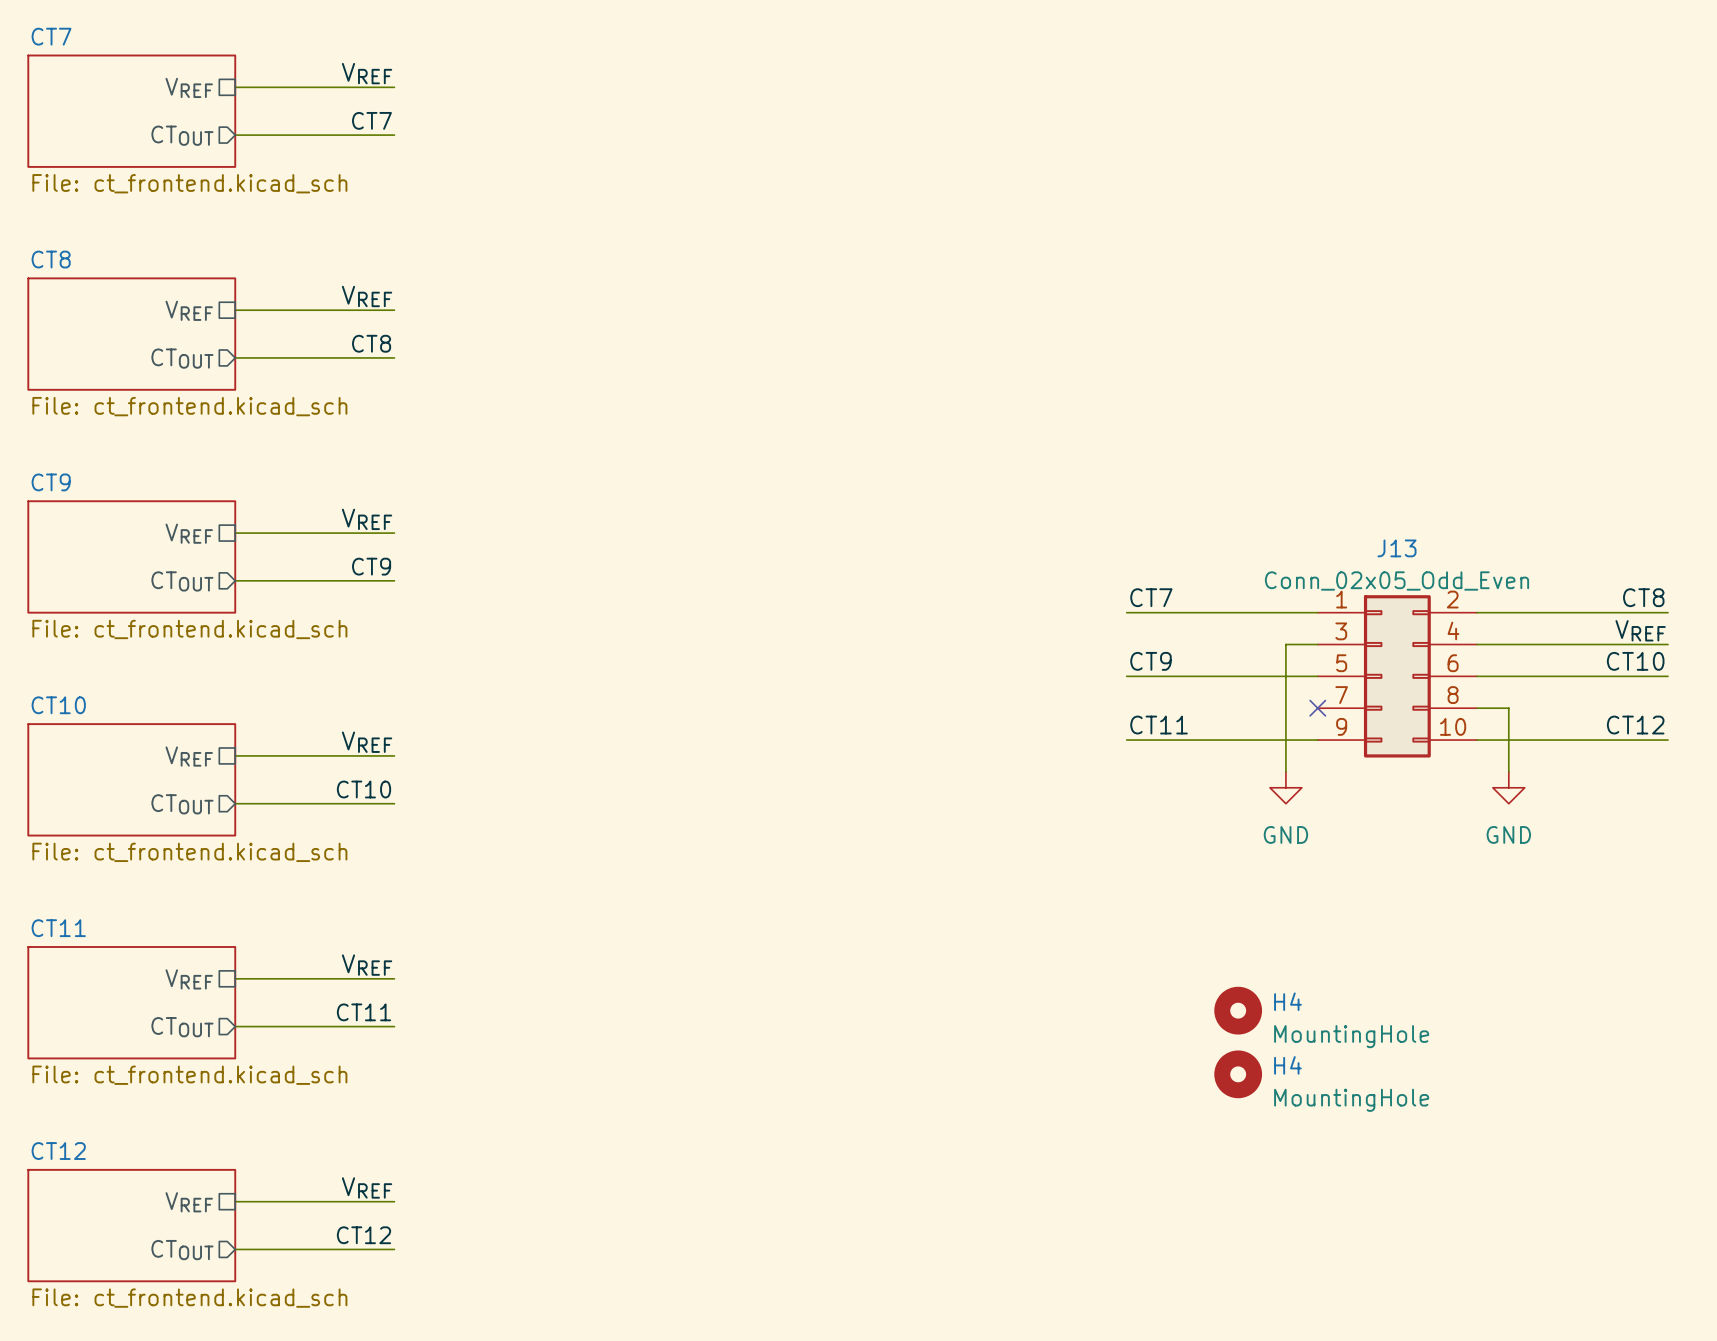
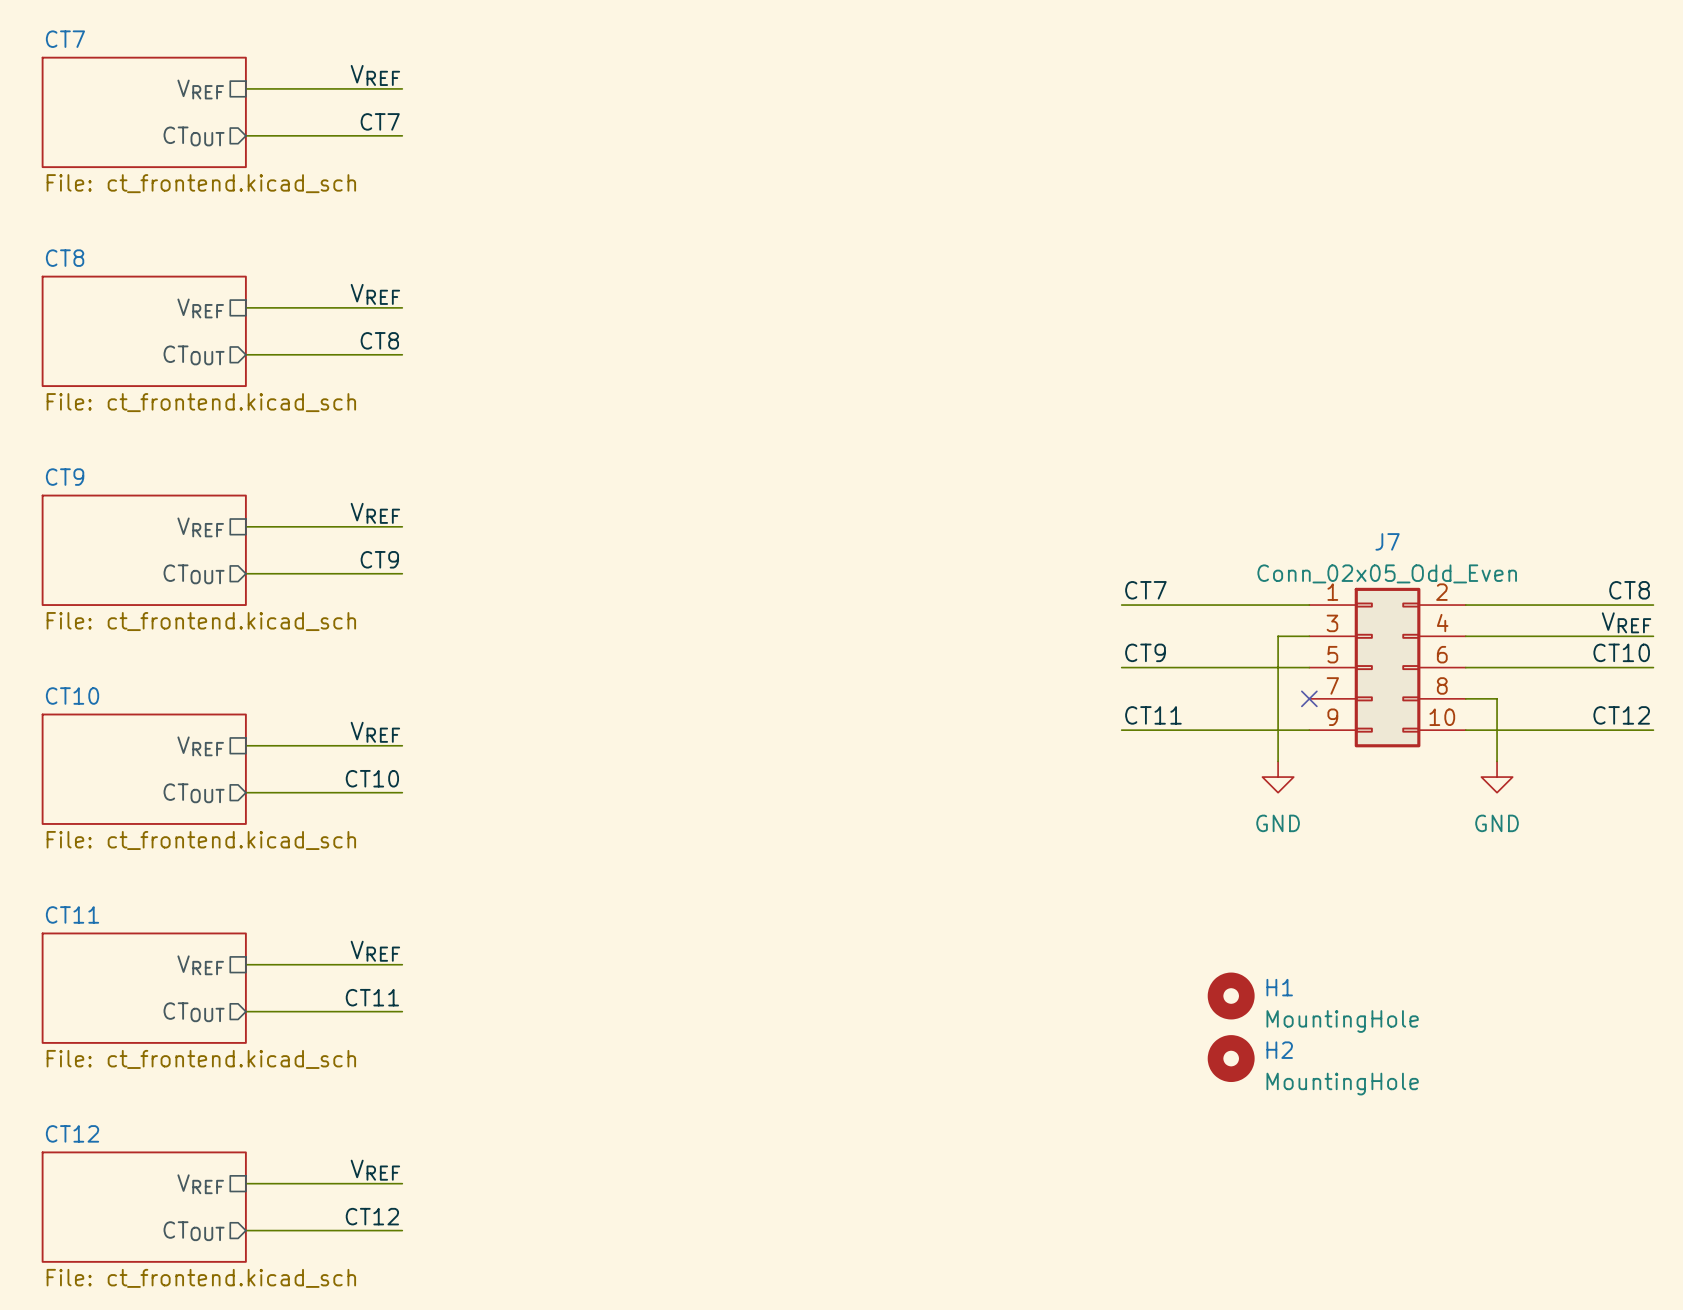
J13 name: J13 (1396, 548) -> J7 (1387, 541)
H4 name: H4 (1287, 1001) -> H1 (1279, 987)
H4 name: H4 (1287, 1065) -> H2 (1279, 1050)

